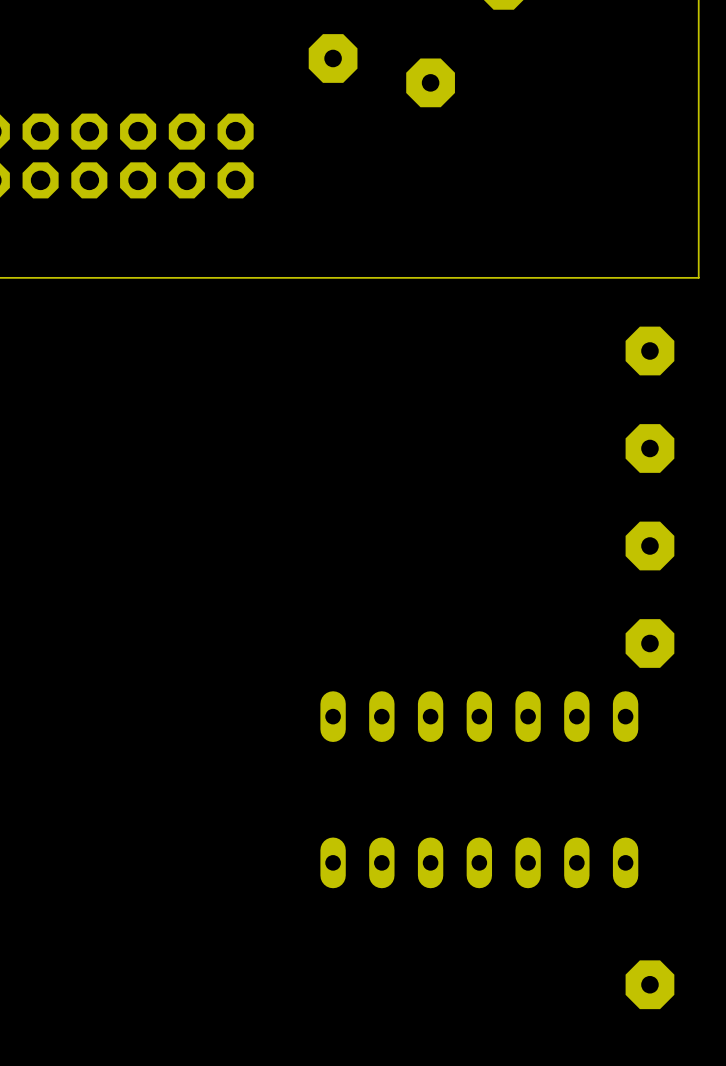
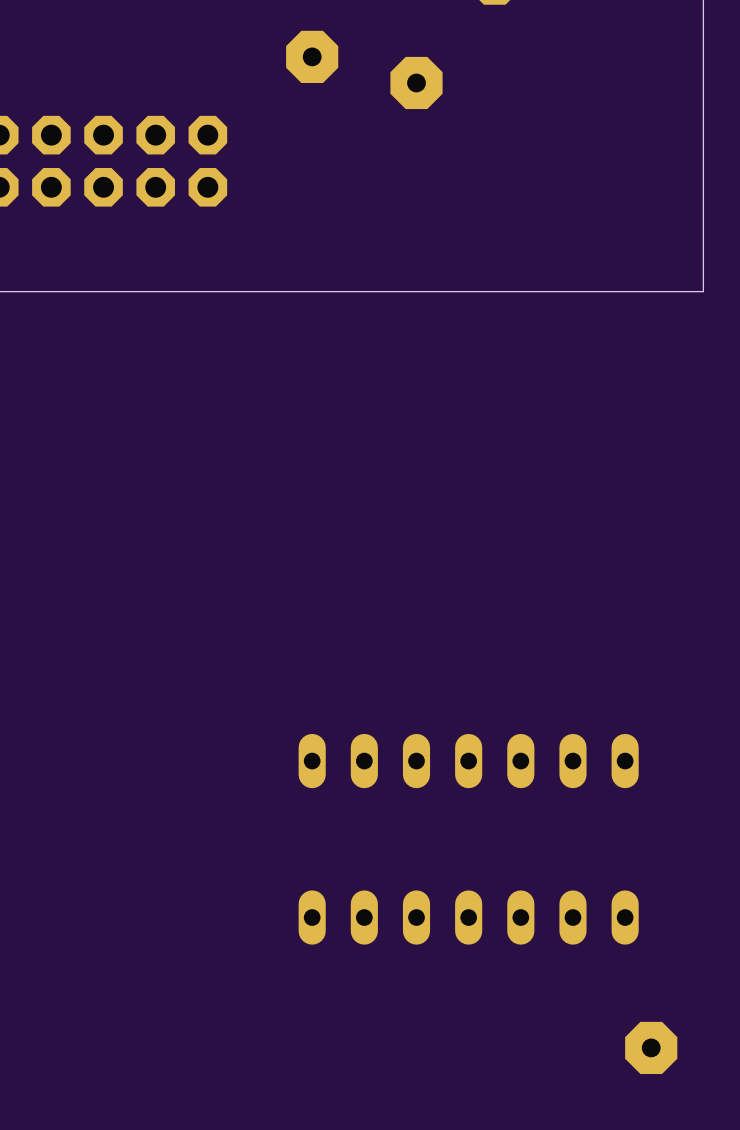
part: (649, 350) -> none
part: (649, 448) -> none
part: (649, 545) -> none
part: (649, 643) -> none

